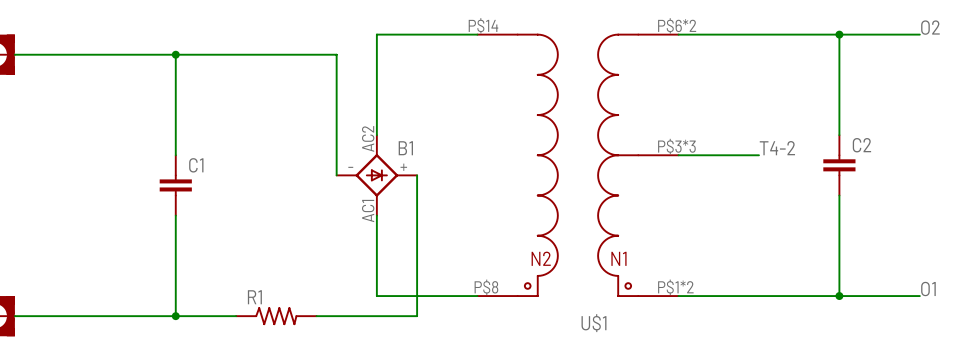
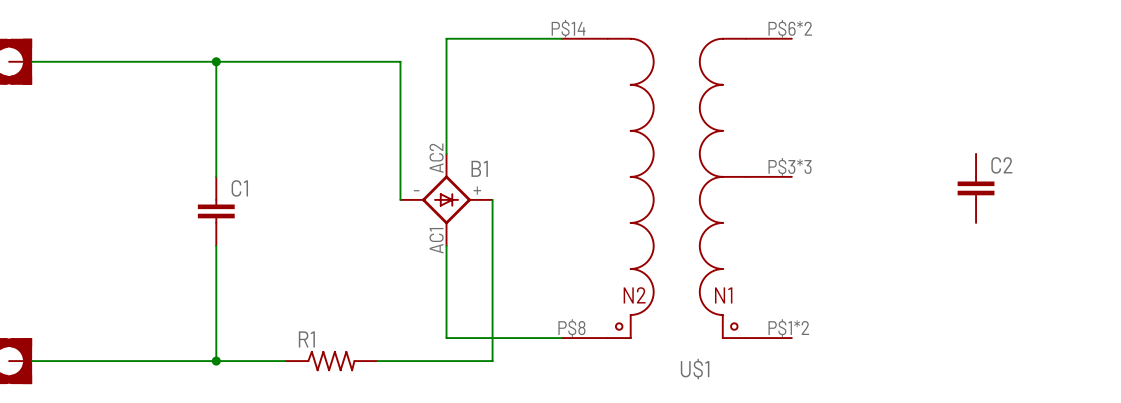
label: O2 (930, 27) -> none
wire: (678, 34) (919, 34) -> none
wire: (839, 34) (839, 135) -> none
junction: (839, 34) -> none
label: T4-2 (777, 148) -> none
wire: (678, 155) (758, 155) -> none
wire: (839, 195) (839, 296) -> none
label: O1 (928, 289) -> none
wire: (678, 296) (919, 296) -> none
junction: (839, 296) -> none

